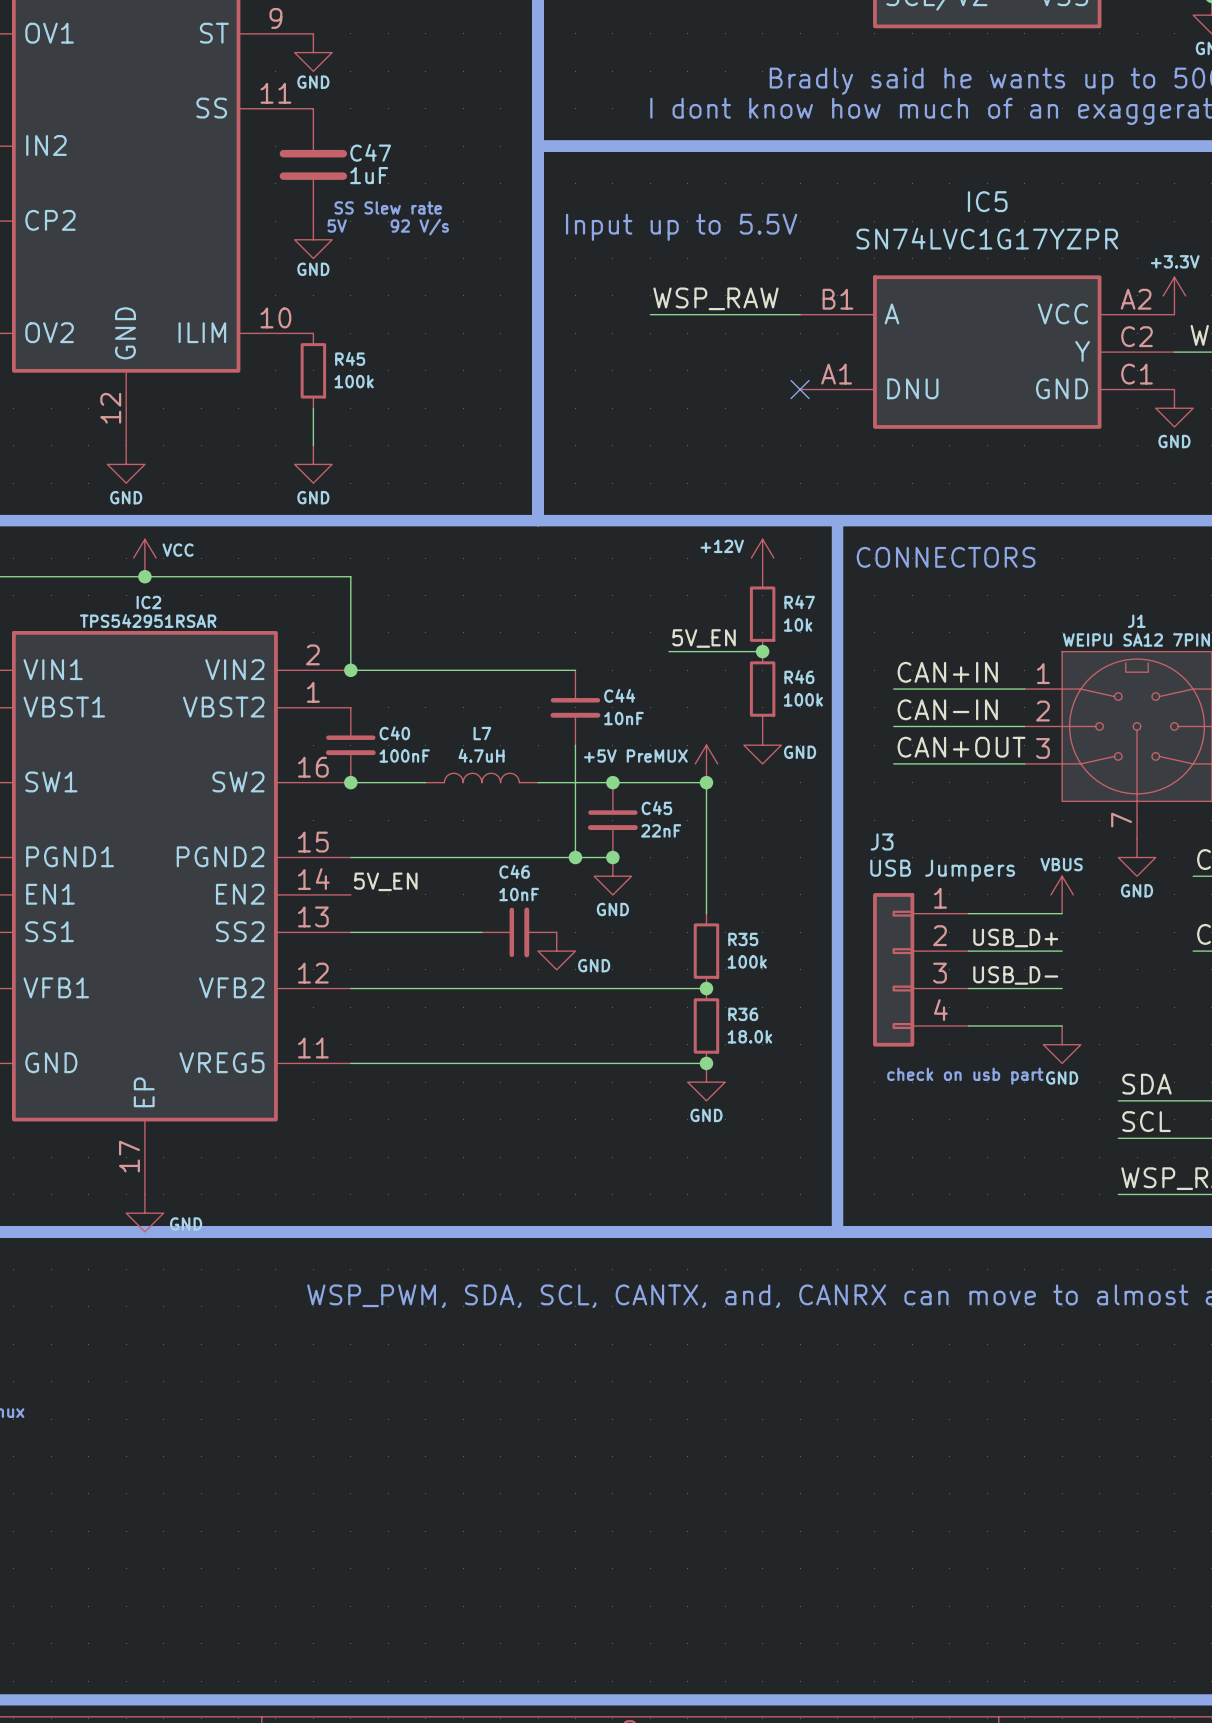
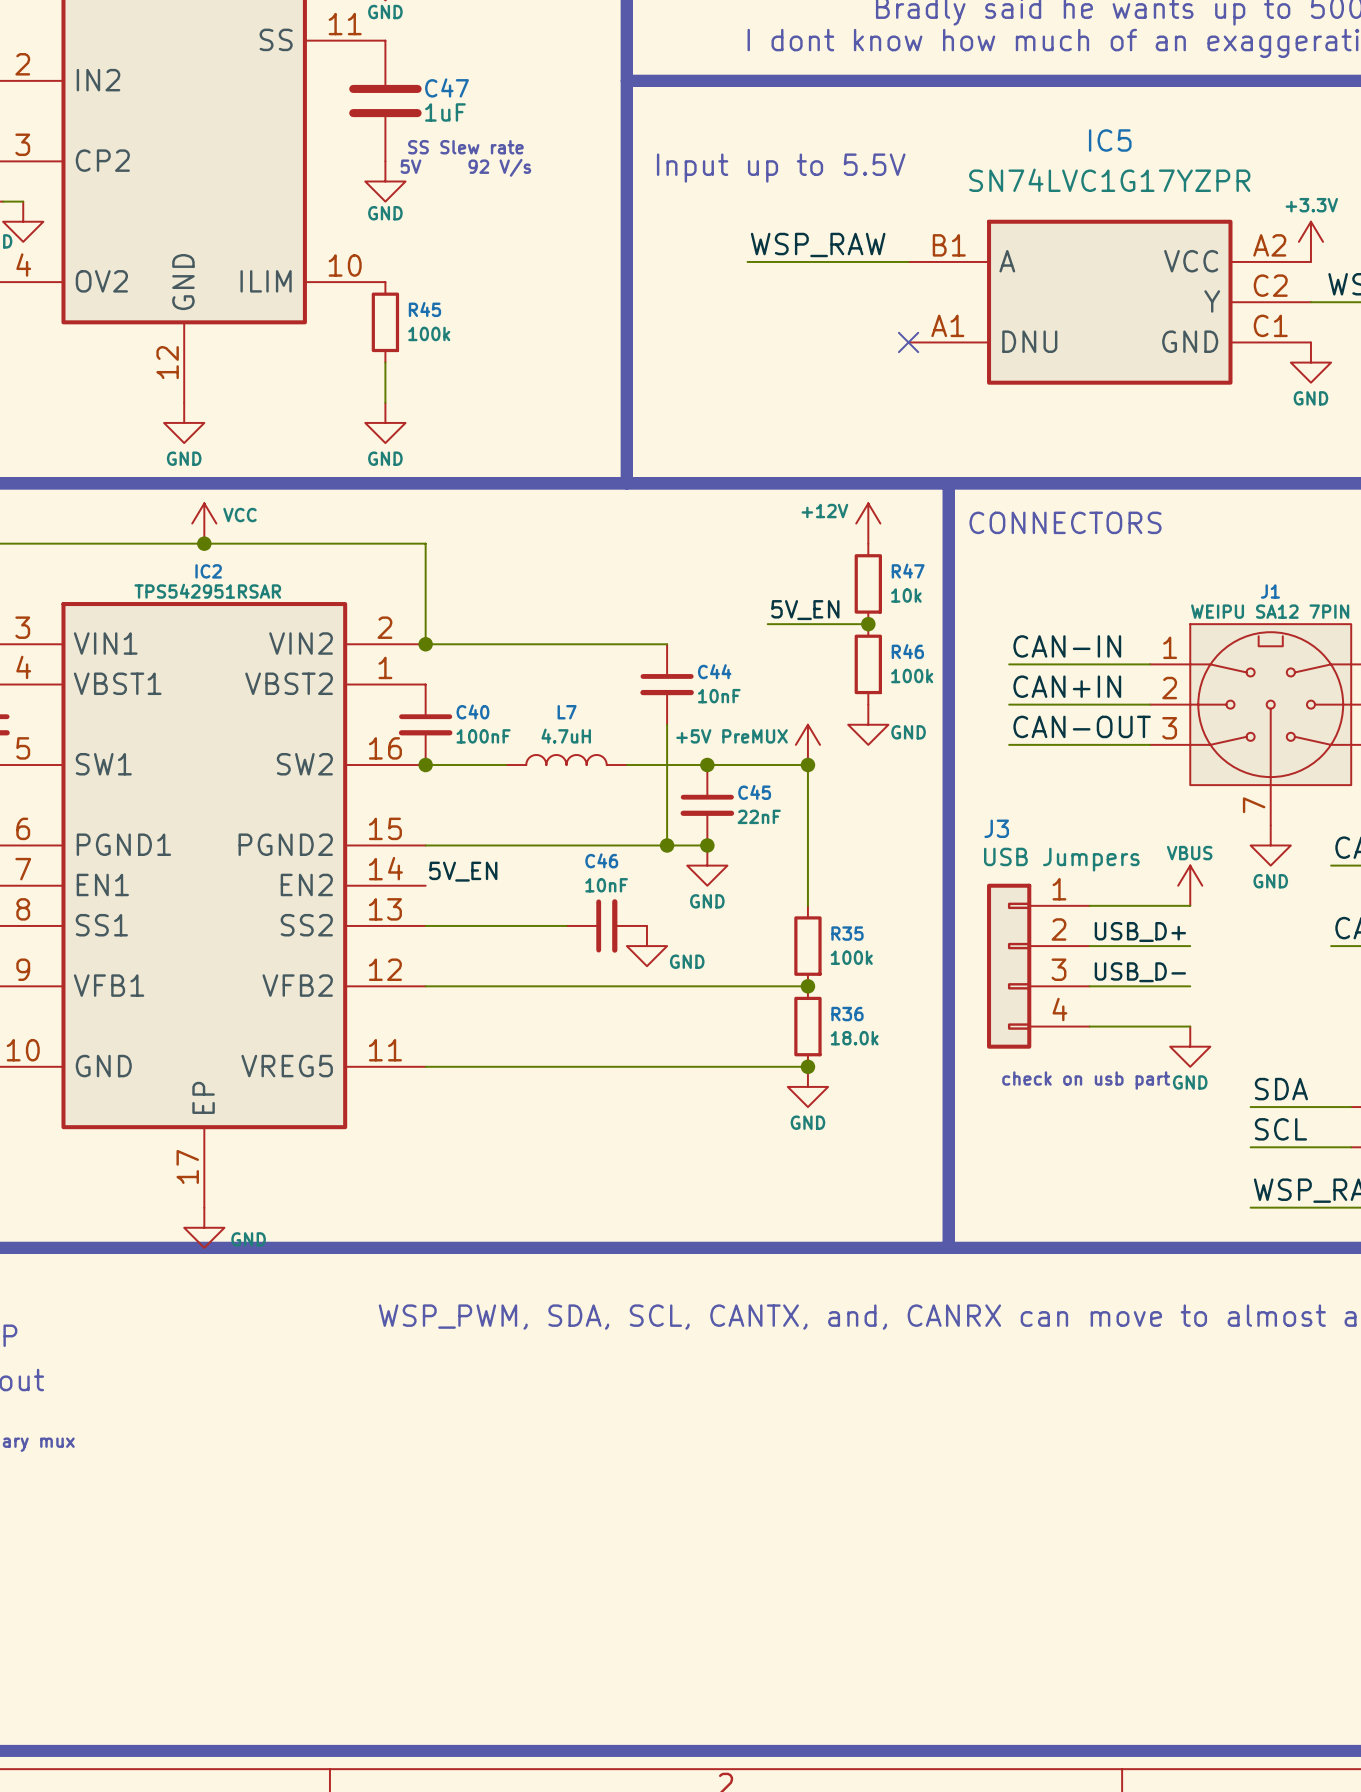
label: CAN+IN (947, 672) -> CAN-IN (1067, 646)
label: CAN-IN (947, 709) -> CAN+IN (1067, 686)
label: CAN+OUT (961, 747) -> CAN-OUT (1082, 726)

